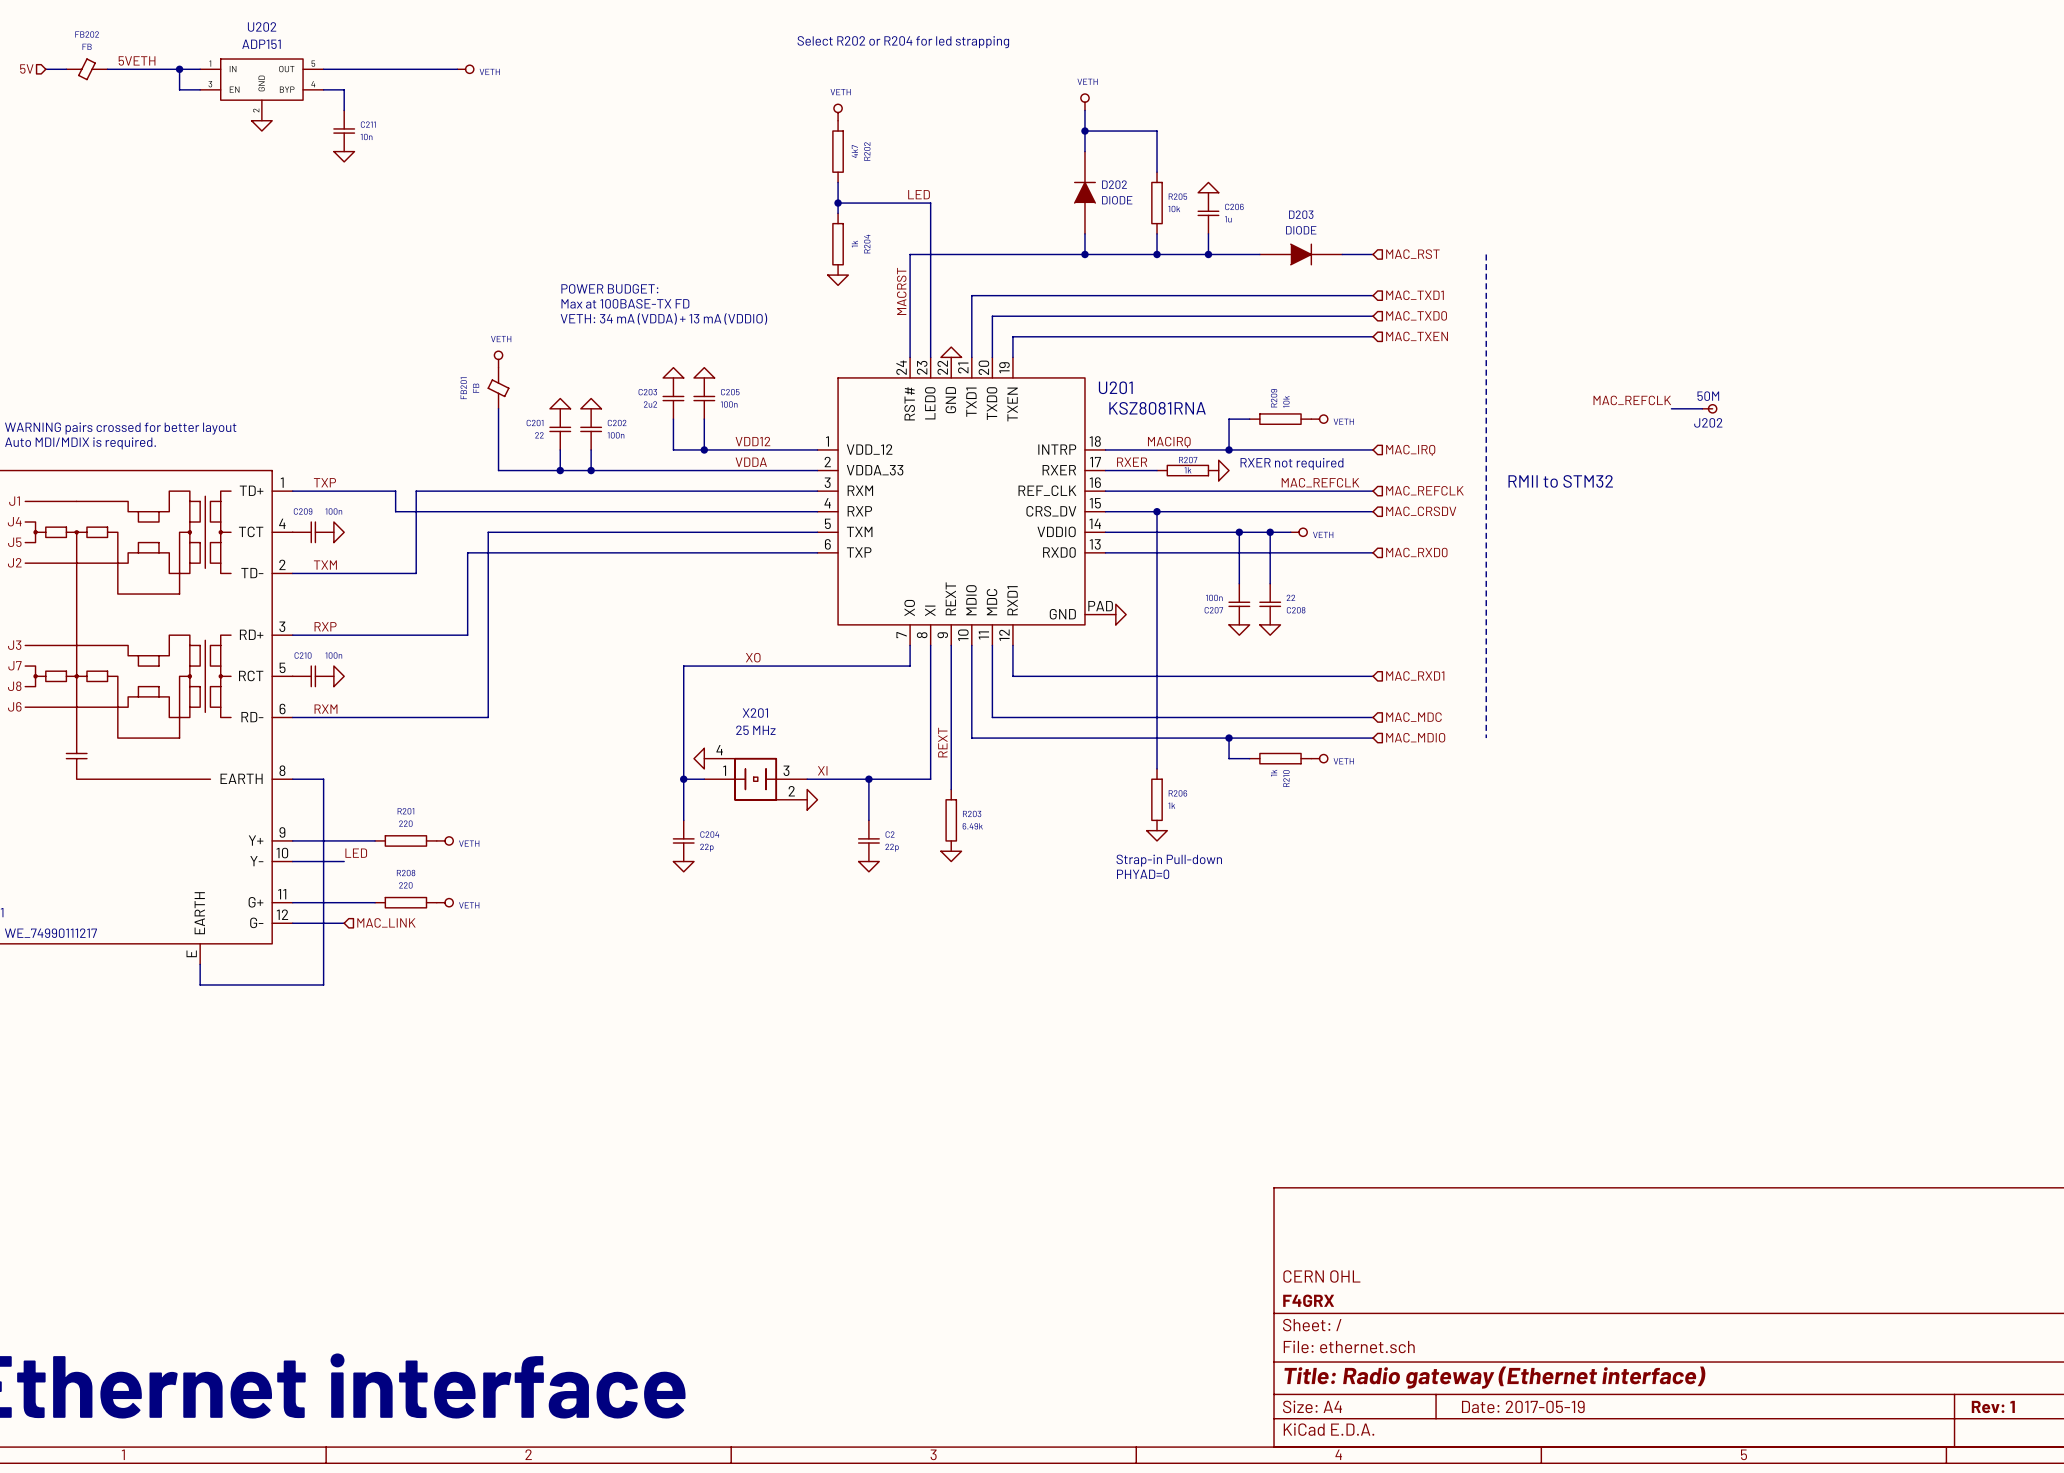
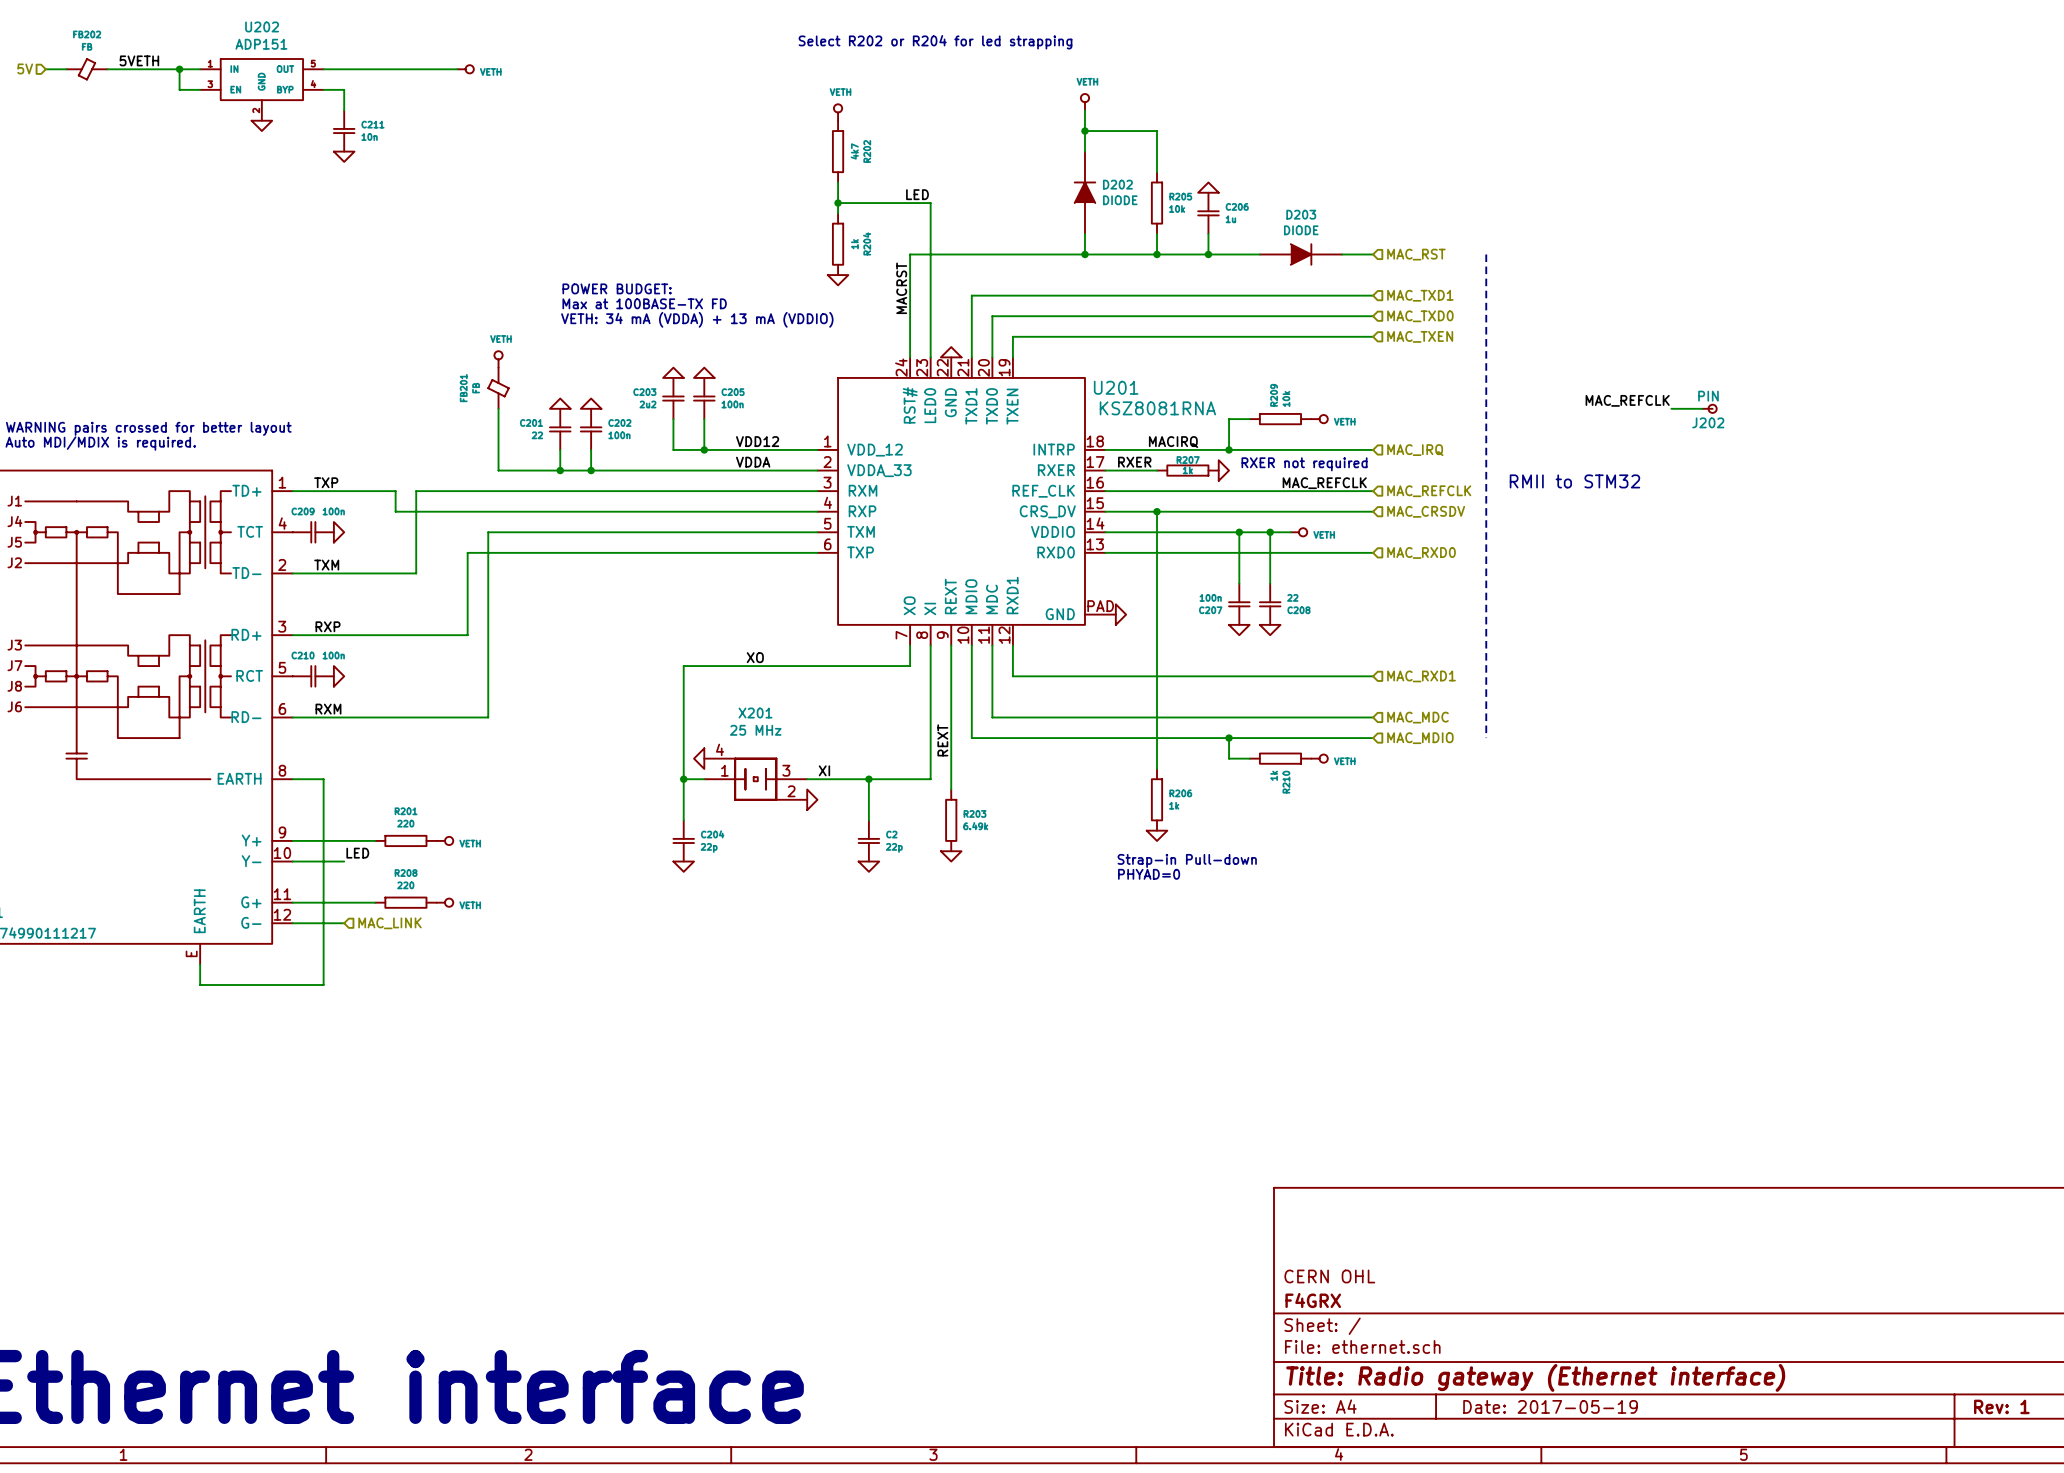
J202 value: 50M (1708, 396) -> PIN (1708, 396)

